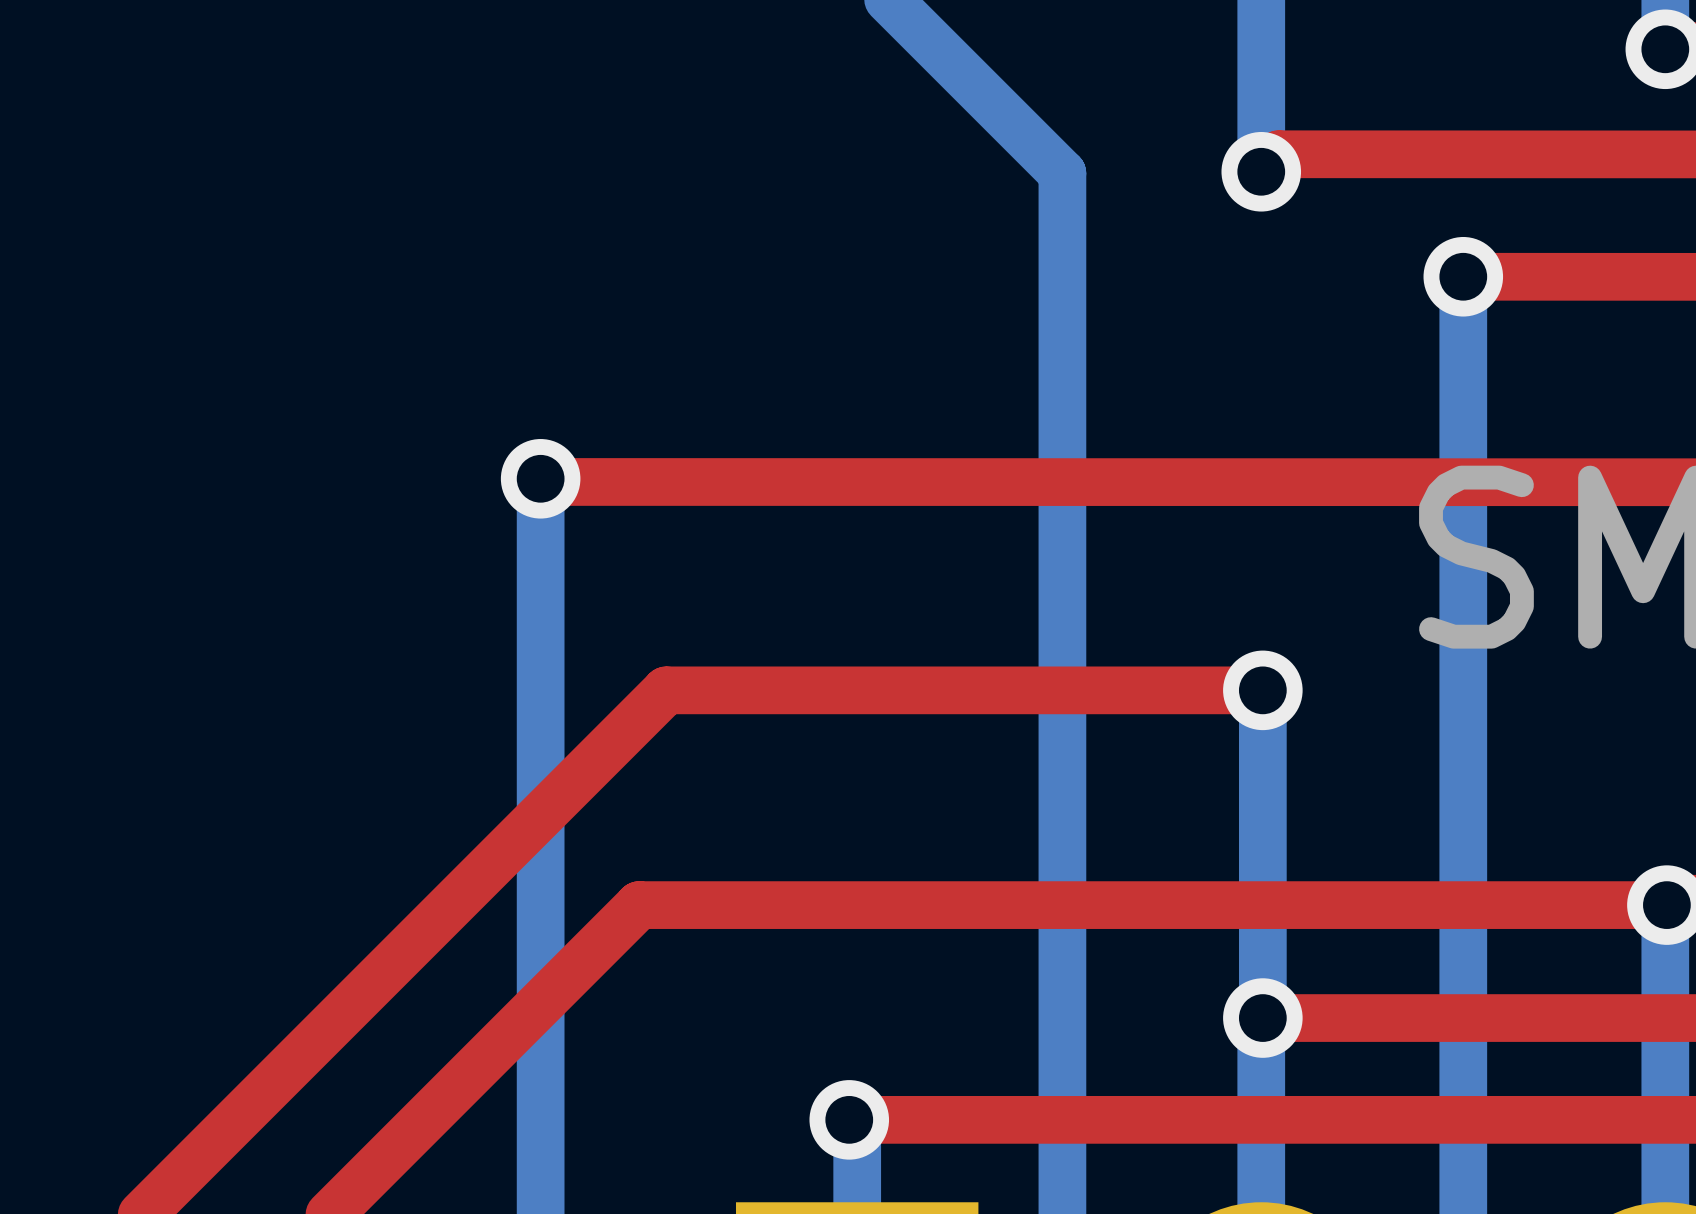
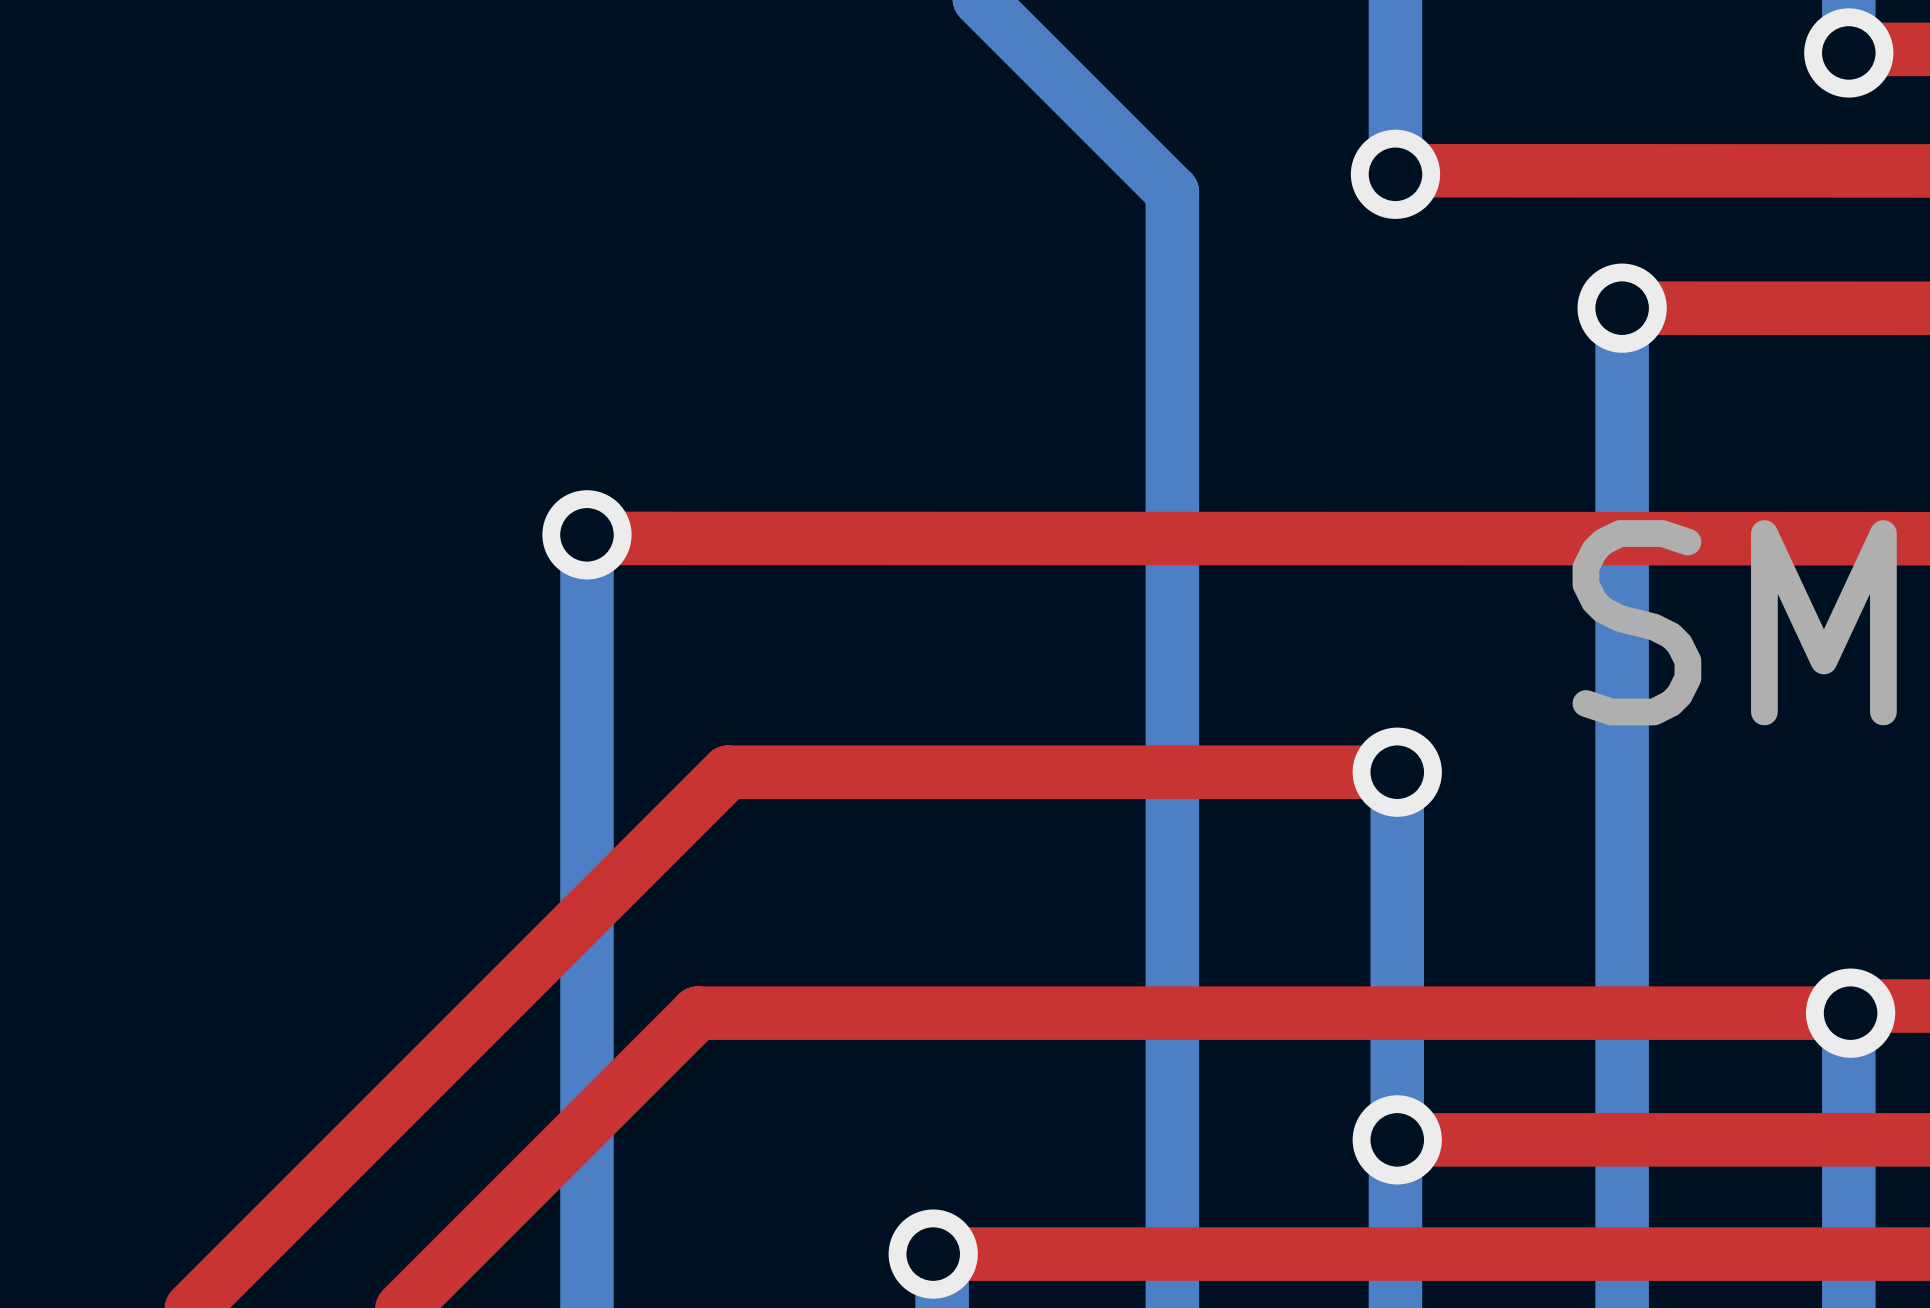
via position: (1261, 171) -> (1395, 174)

